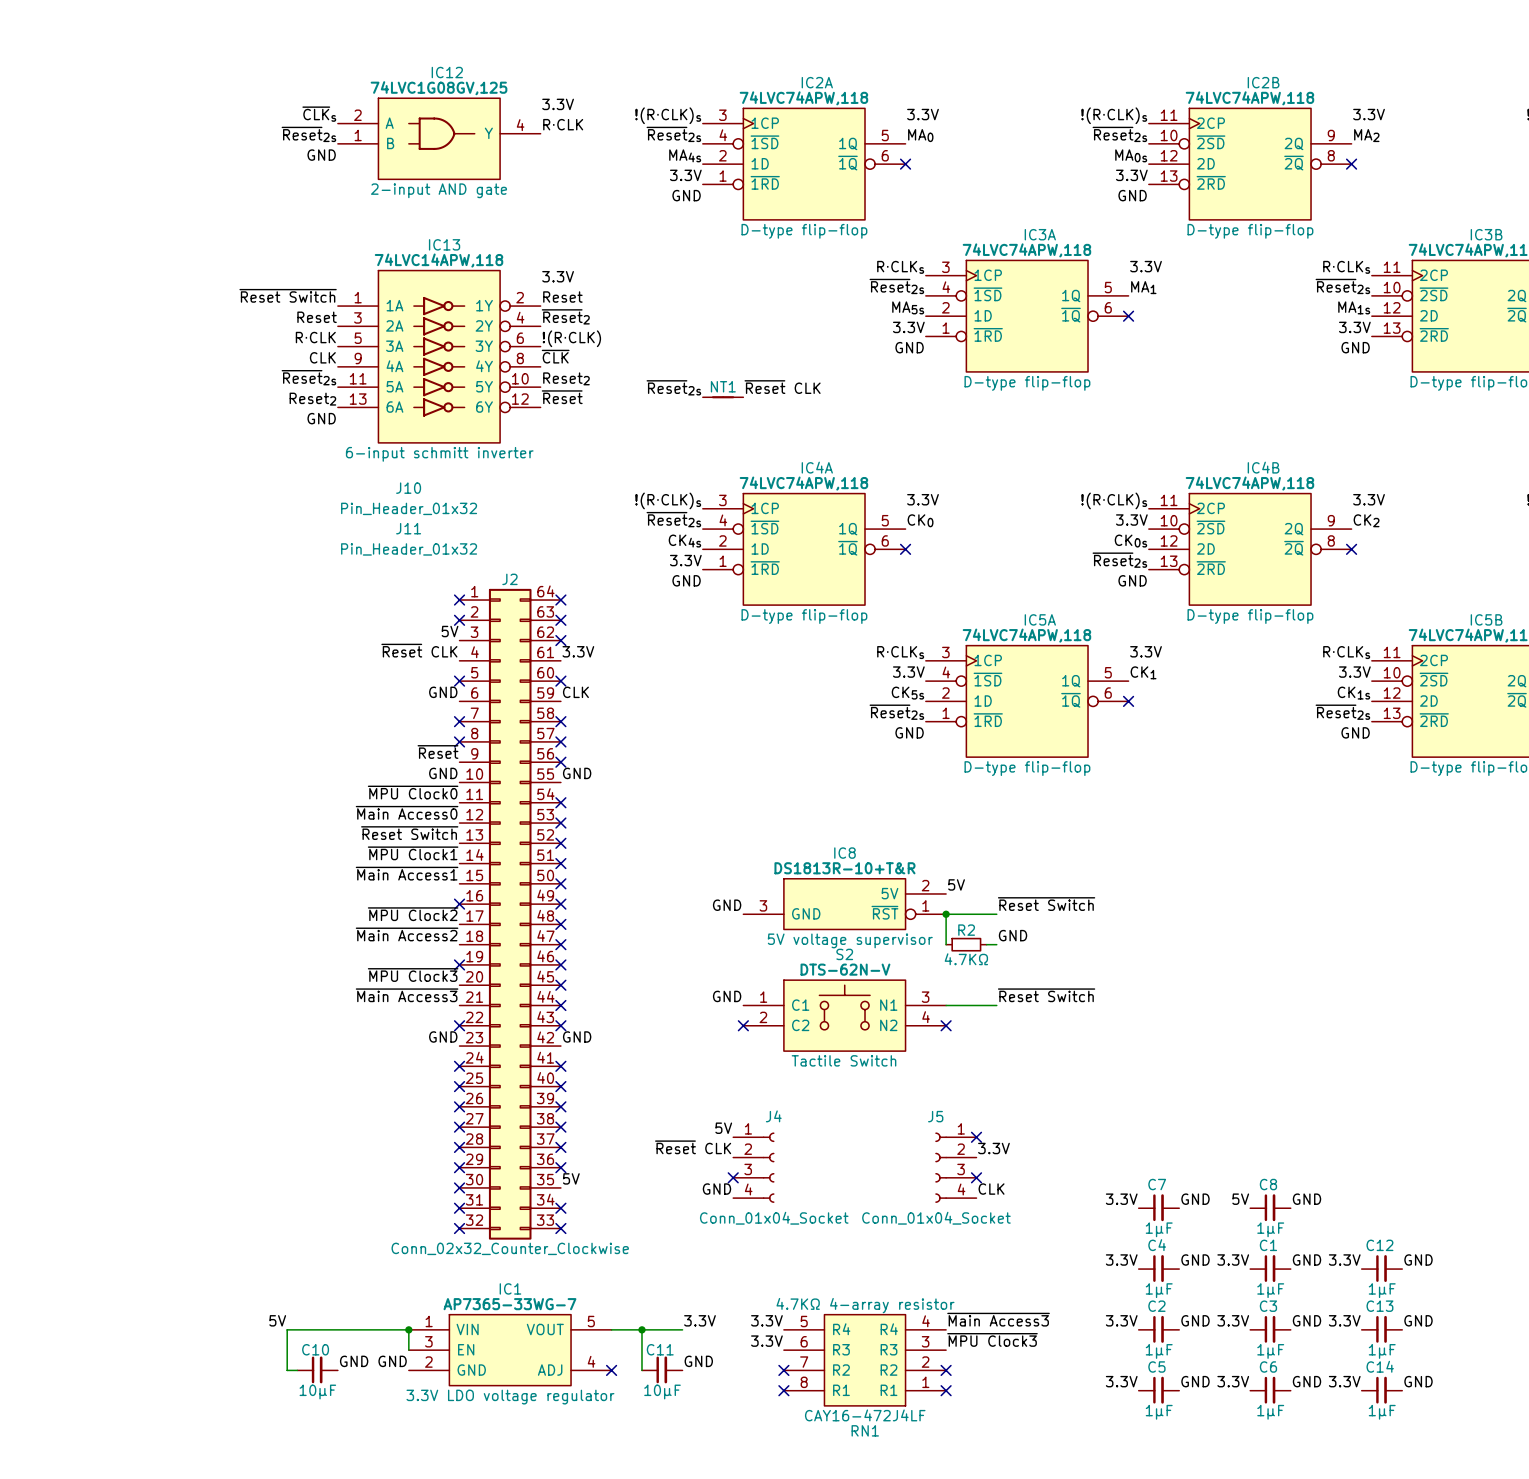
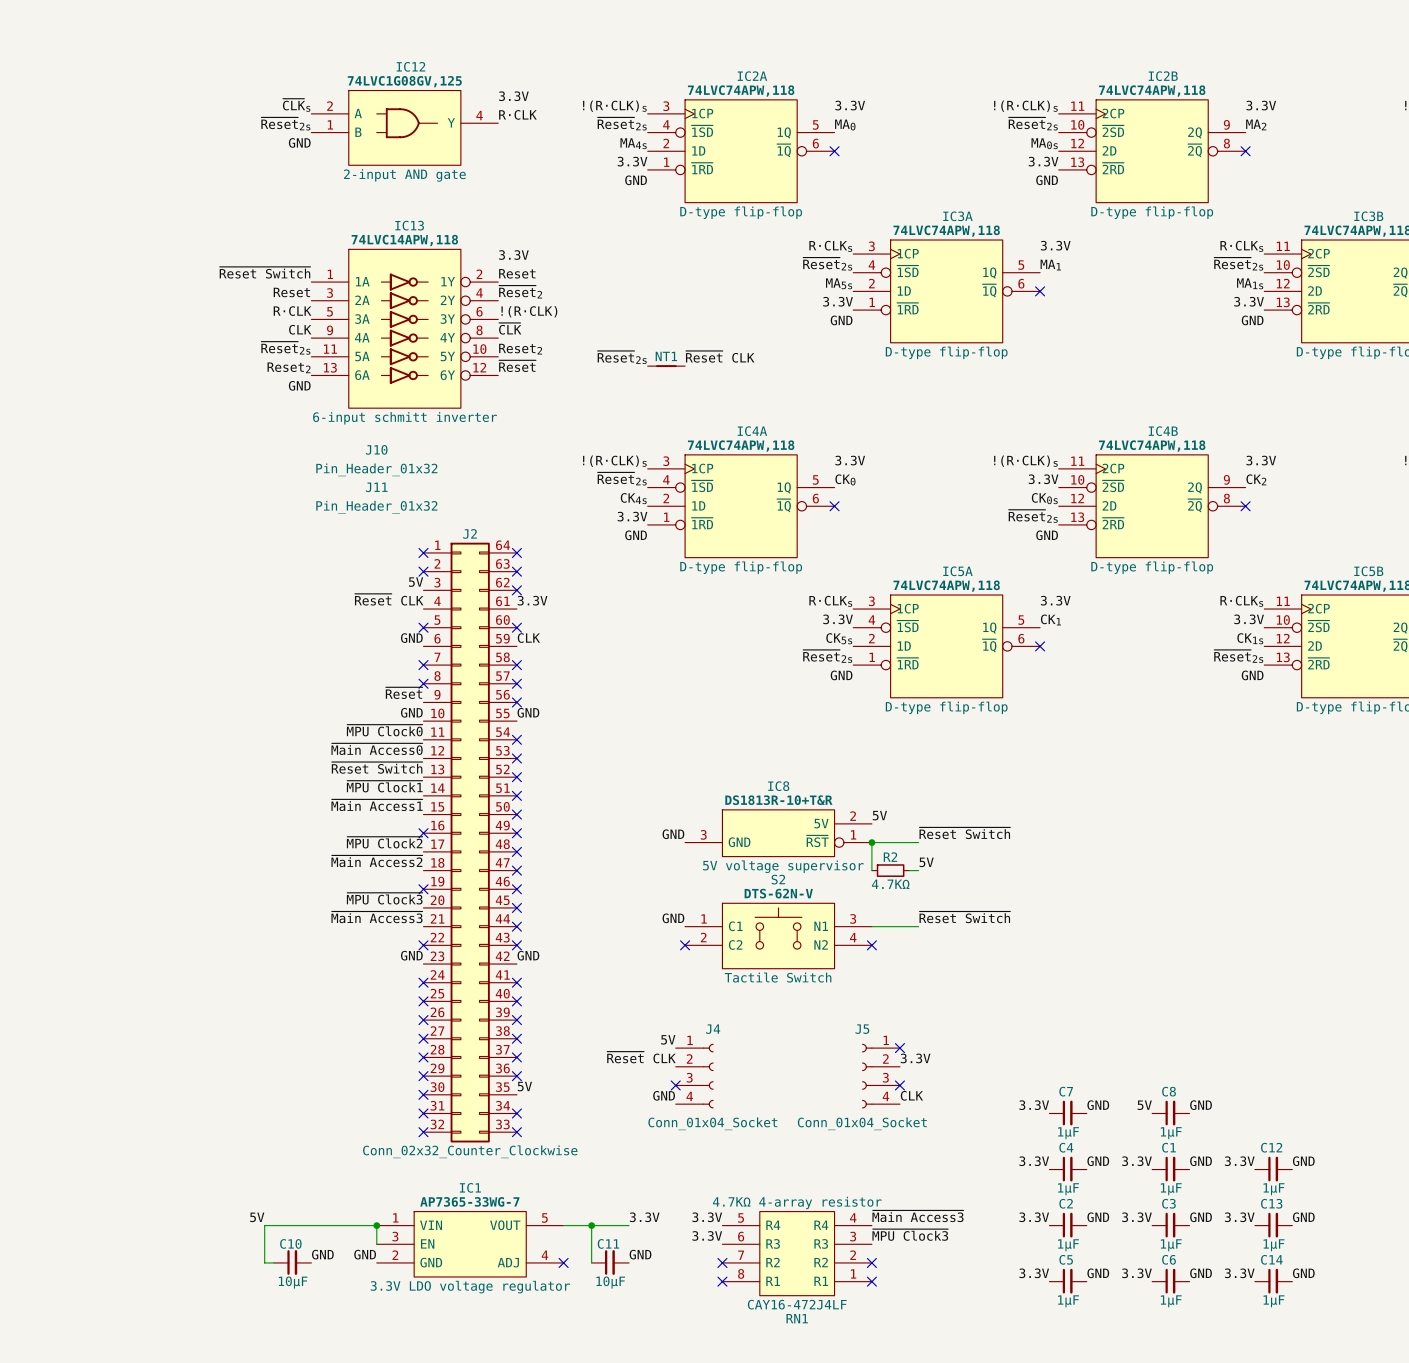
label: GND (1013, 935) -> 5V (926, 862)

